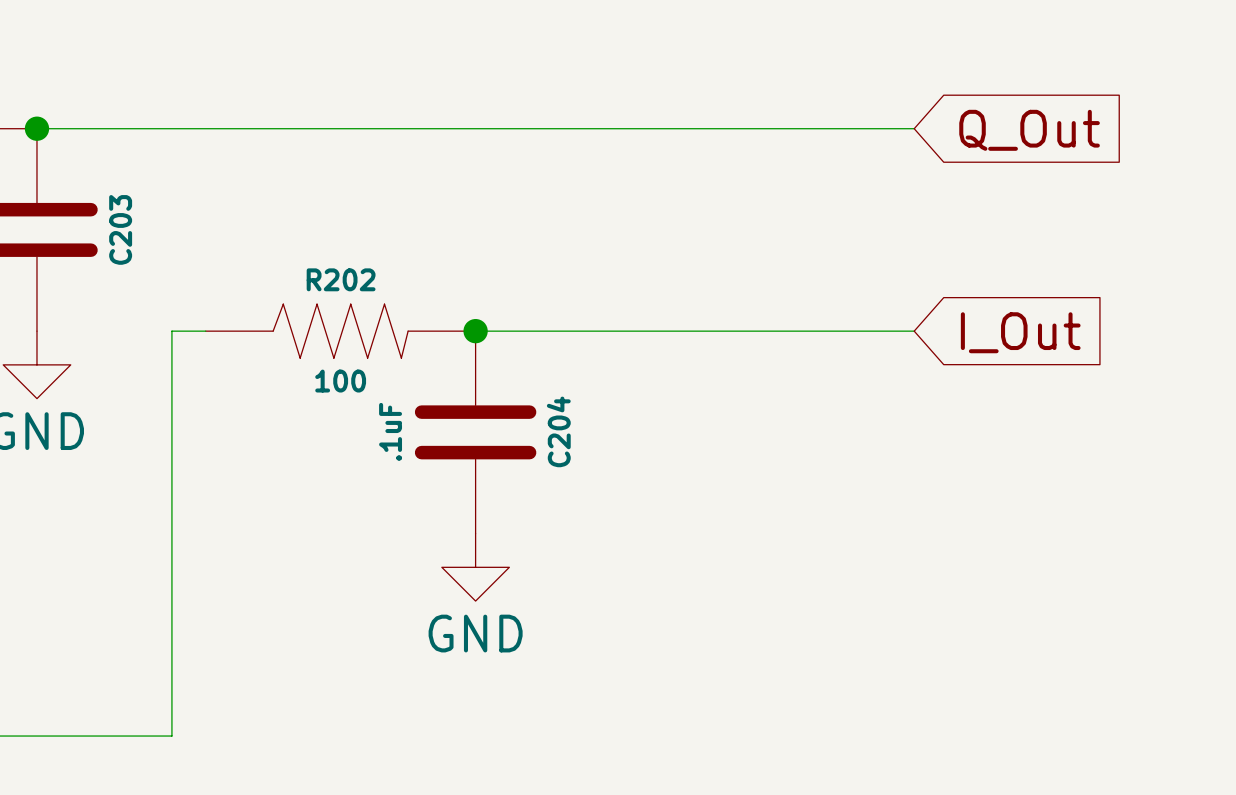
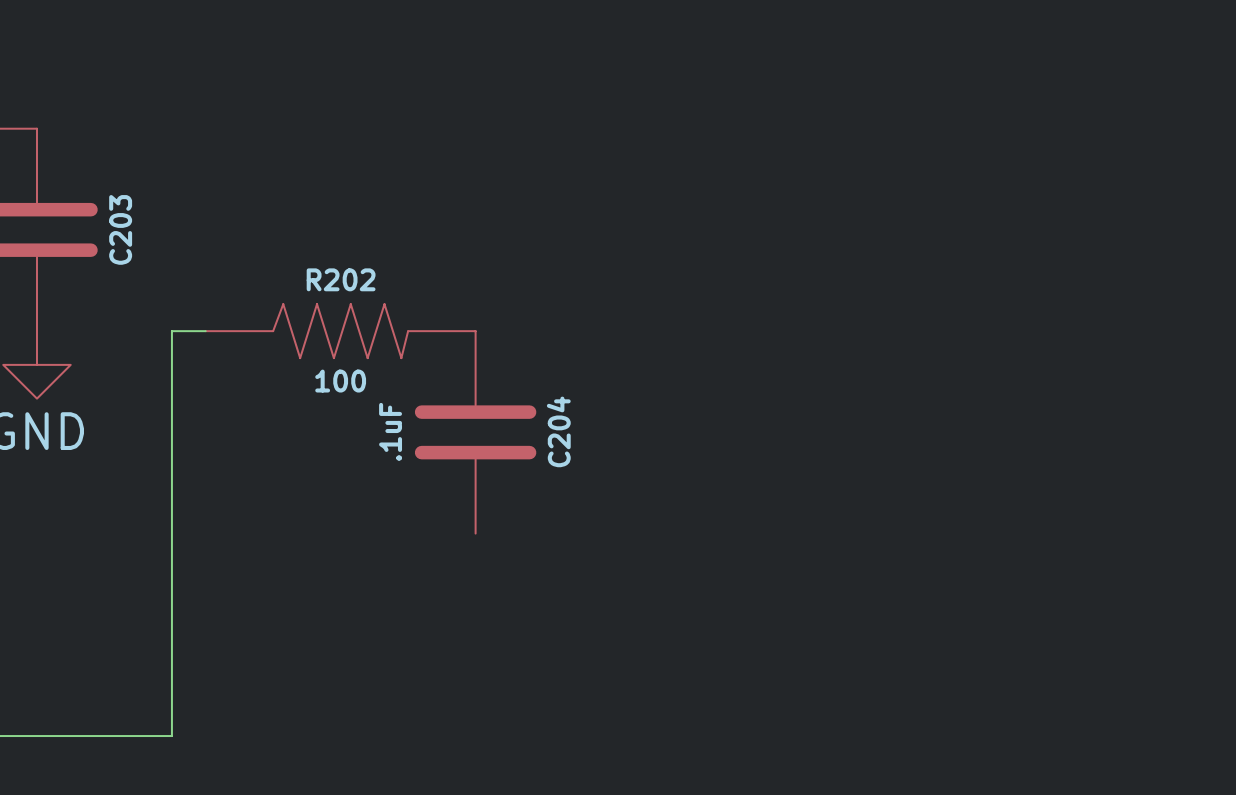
wire: (36, 128) (914, 128) -> none
junction: (36, 128) -> none
global label: Q_Out (1029, 130) -> none
wire: (475, 331) (914, 331) -> none
junction: (475, 331) -> none
global label: I_Out (1020, 332) -> none
power symbol: GND (475, 567) -> none

